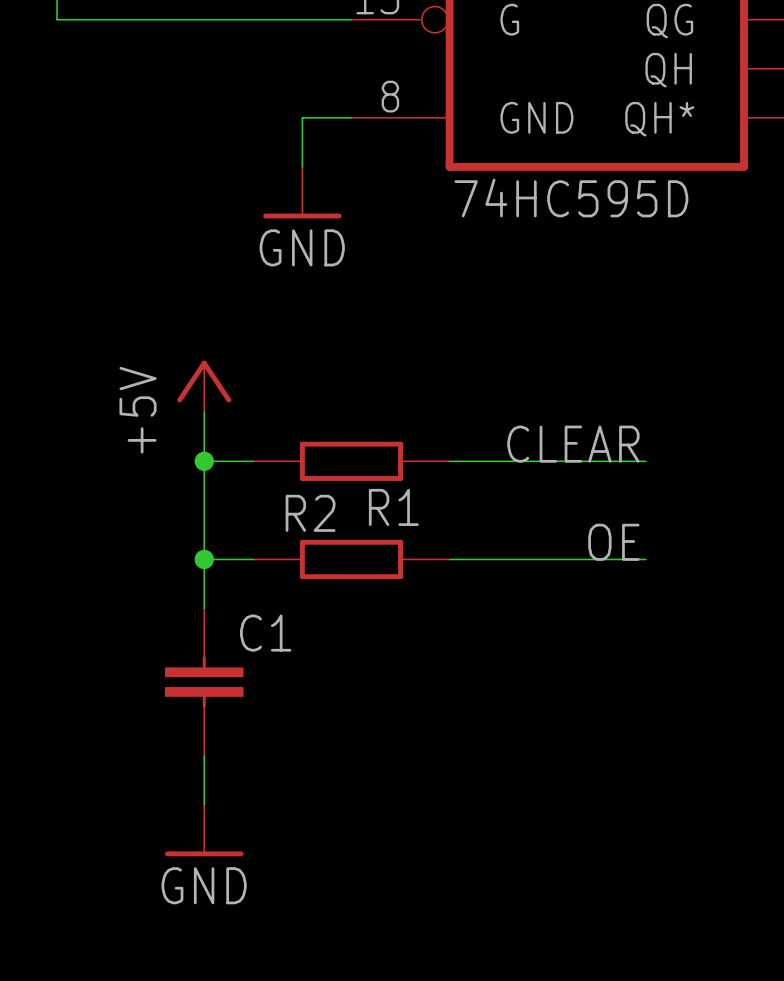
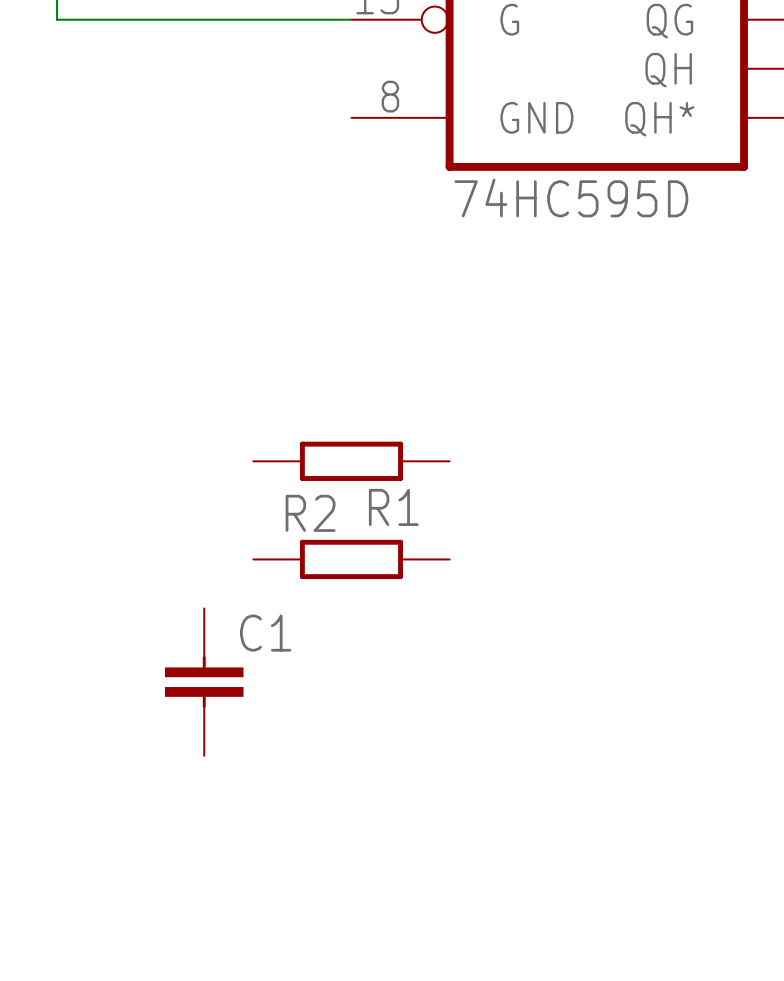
wire: (351, 117) (302, 117) (302, 166) -> none
power symbol: GND (302, 192) -> none
power symbol: +5V (204, 386) -> none
wire: (204, 412) (204, 608) -> none
label: CLEAR (573, 444) -> none
wire: (204, 461) (253, 461) -> none
junction: (204, 461) -> none
wire: (449, 461) (645, 461) -> none
label: OE (613, 542) -> none
wire: (204, 559) (253, 559) -> none
junction: (204, 559) -> none
wire: (449, 559) (645, 559) -> none
wire: (204, 755) (204, 804) -> none
power symbol: GND (204, 830) -> none

